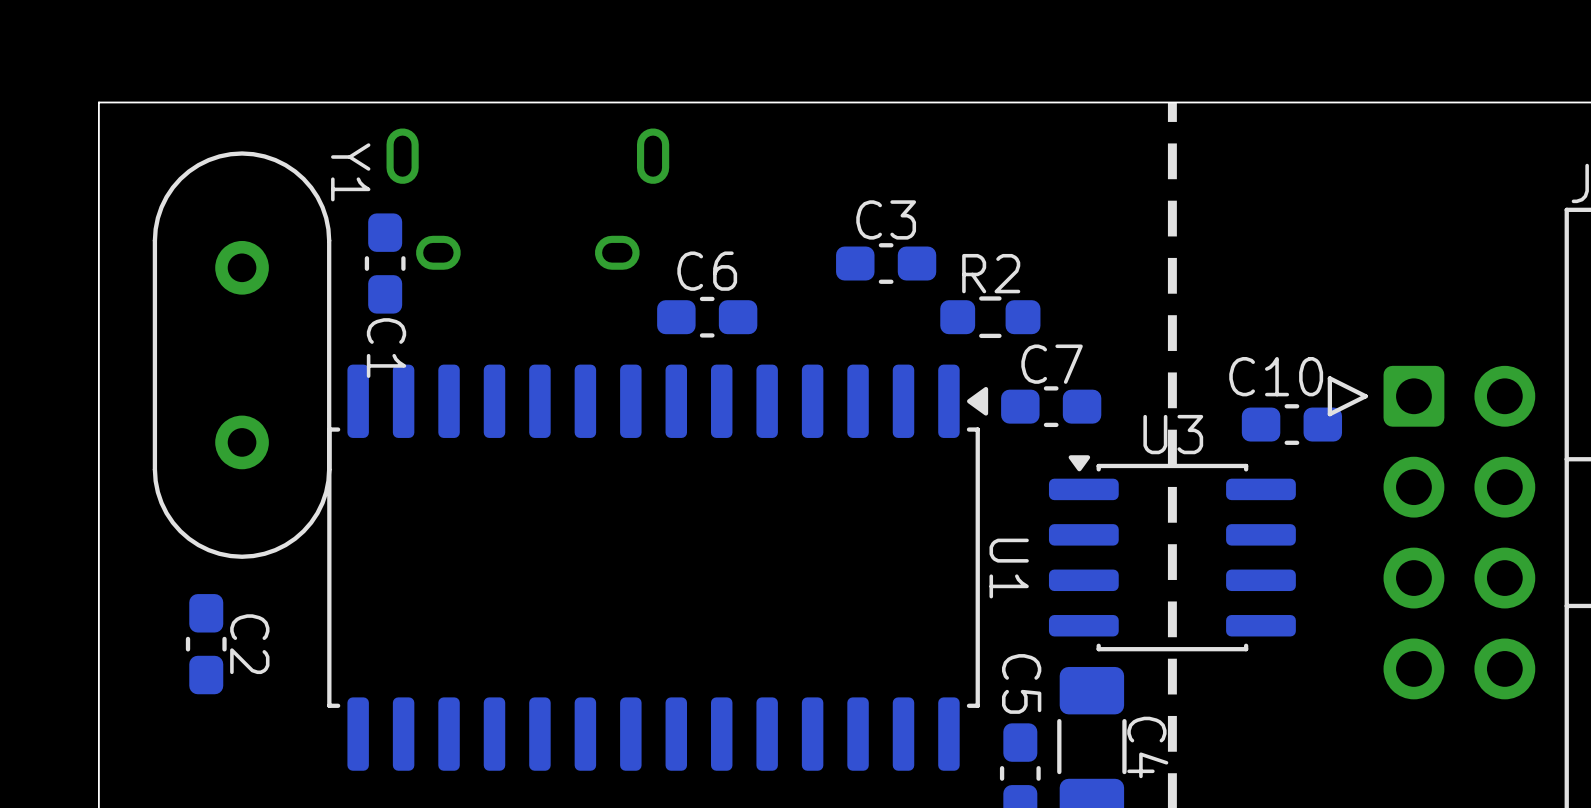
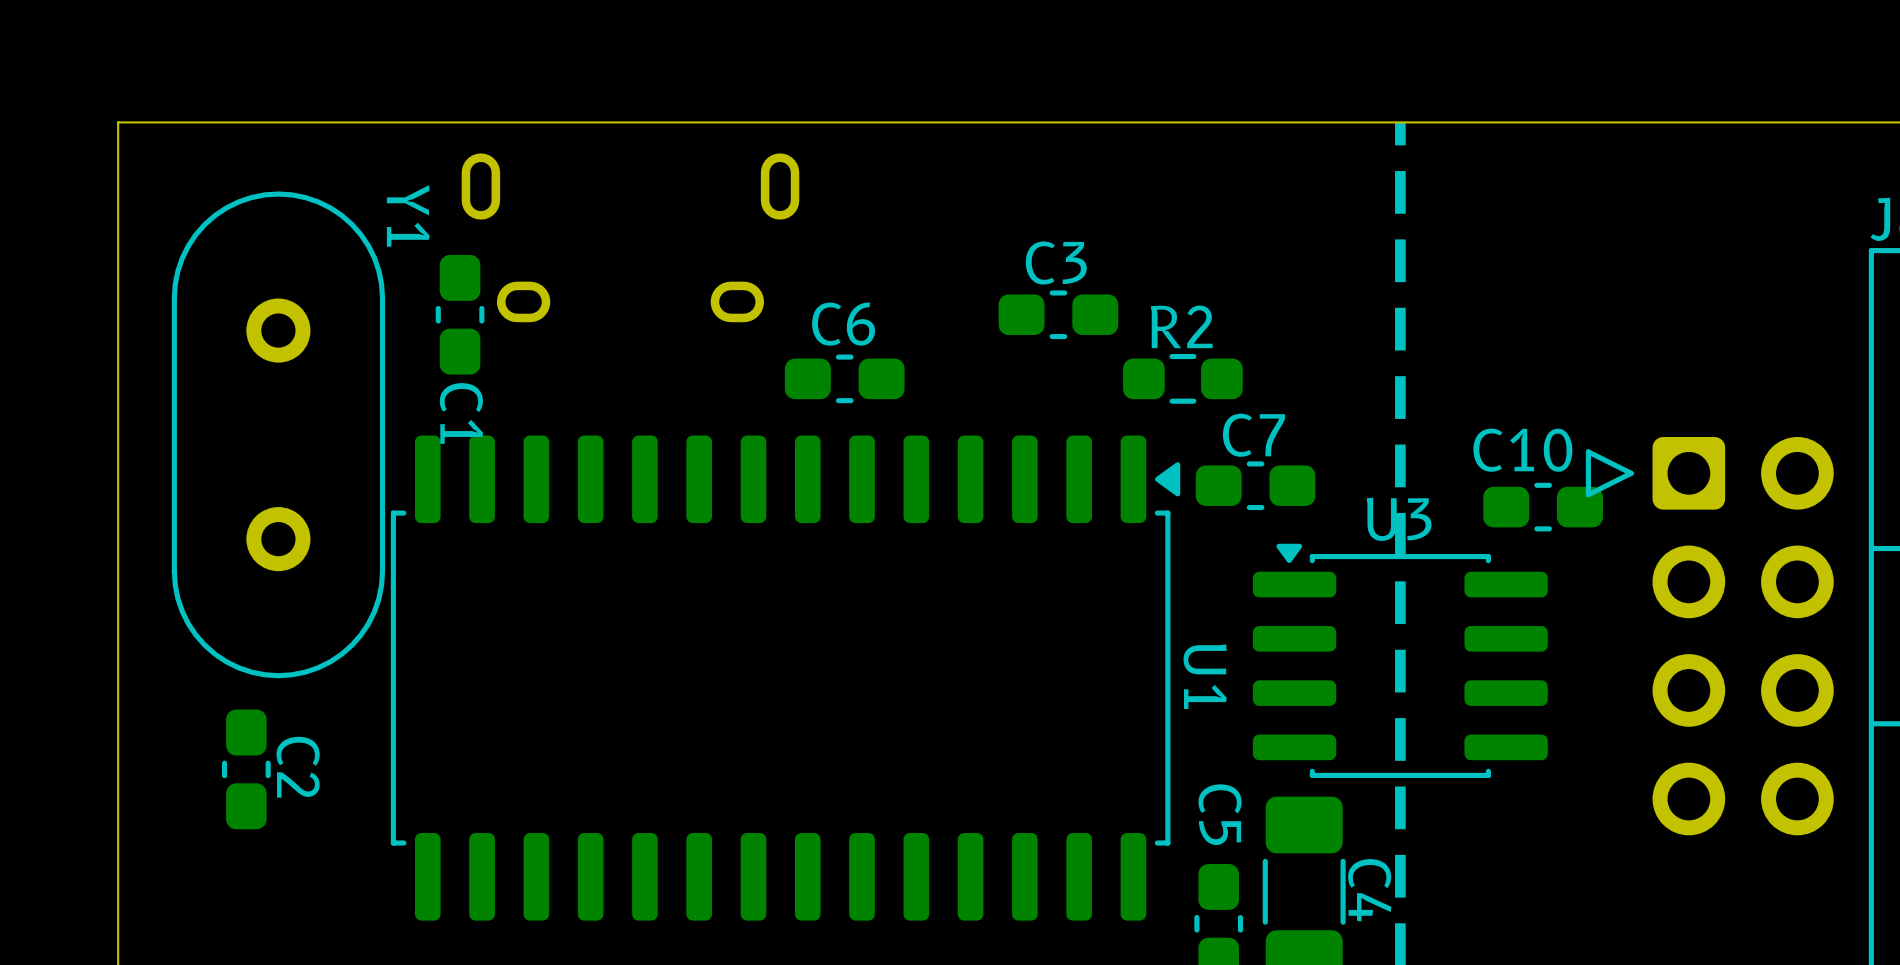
Y1 position: (242, 355) -> (278, 434)

